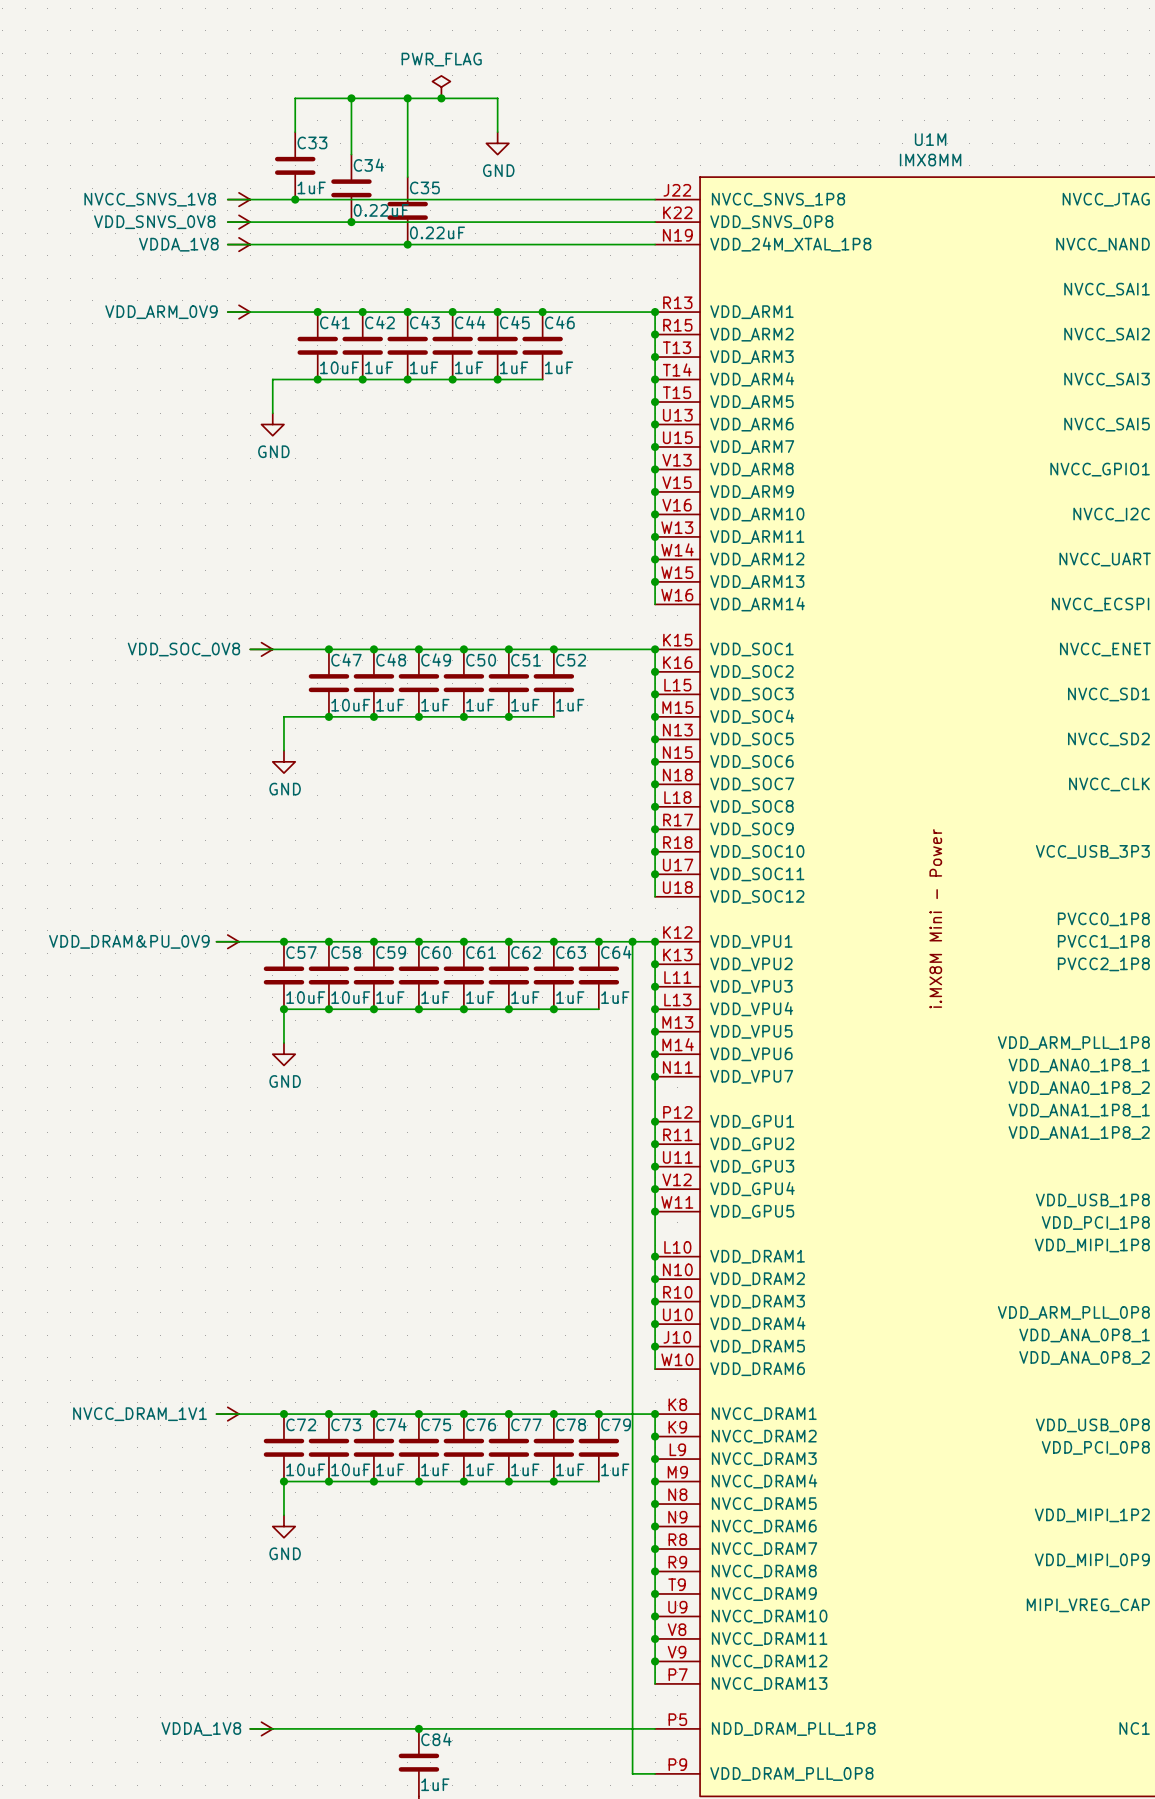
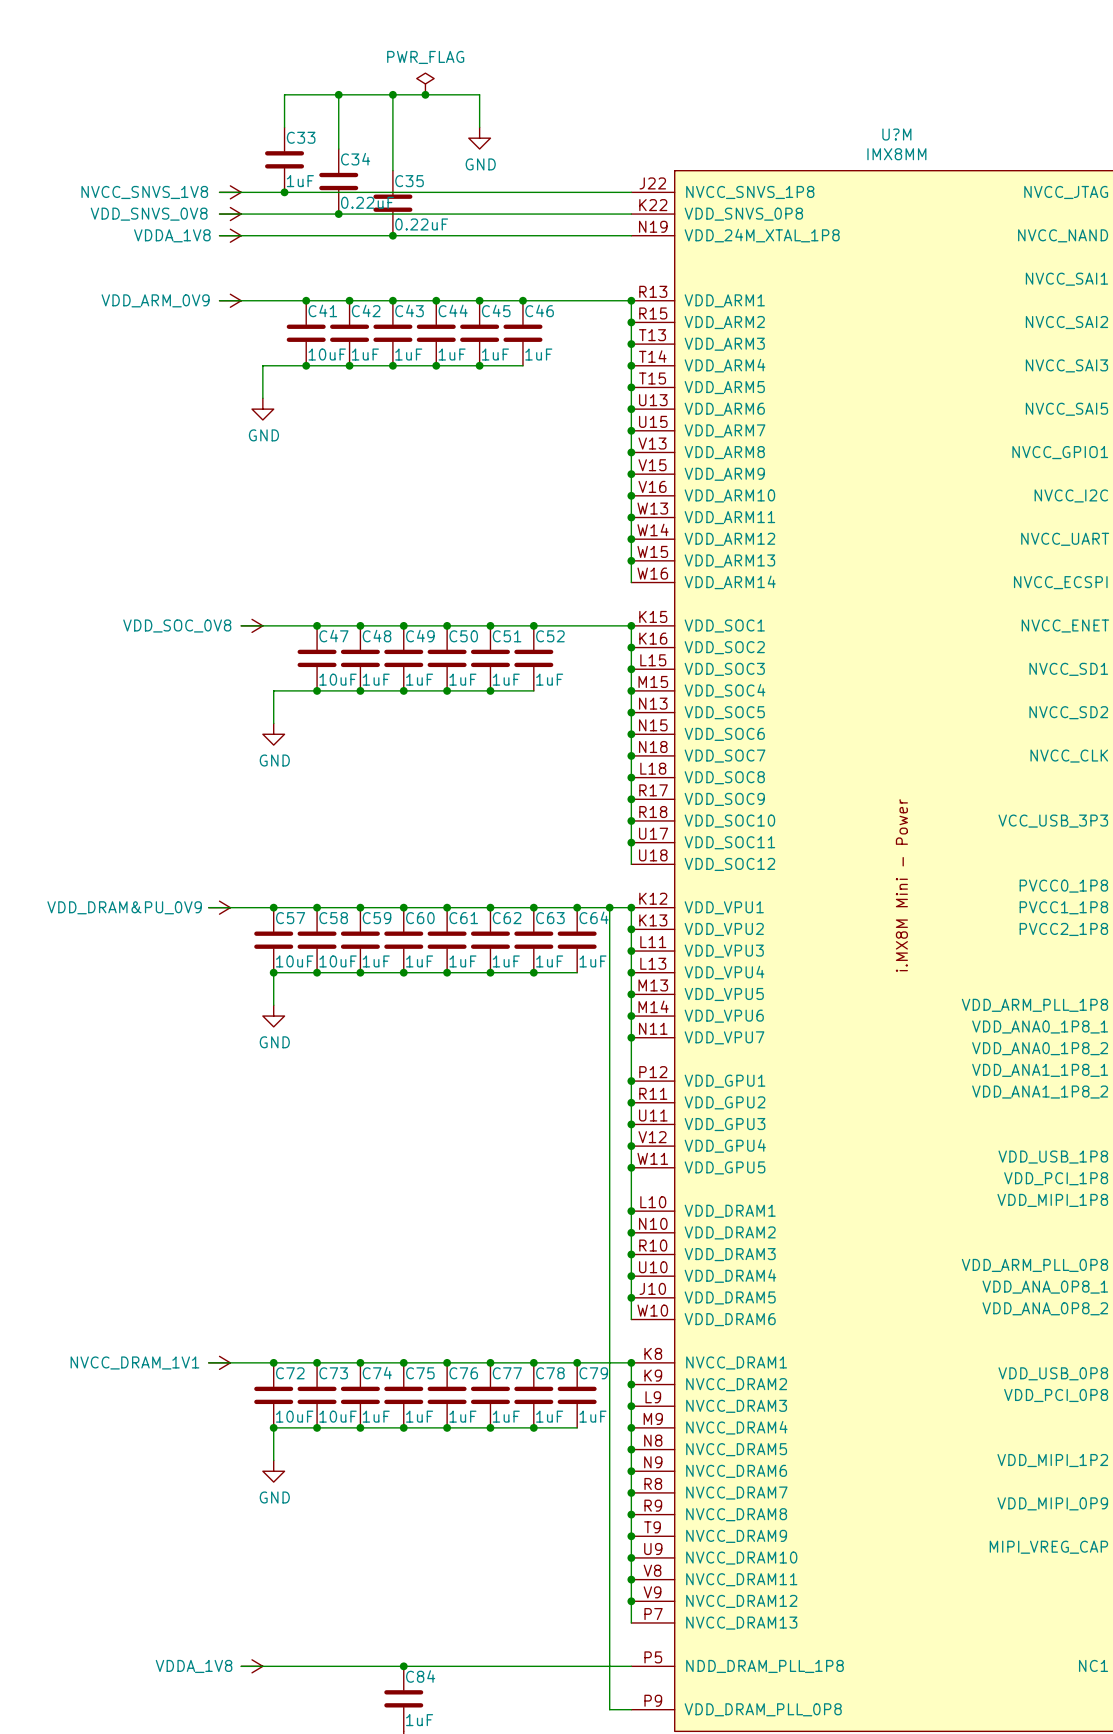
U1M name: U1M (930, 139) -> U?M (896, 134)

